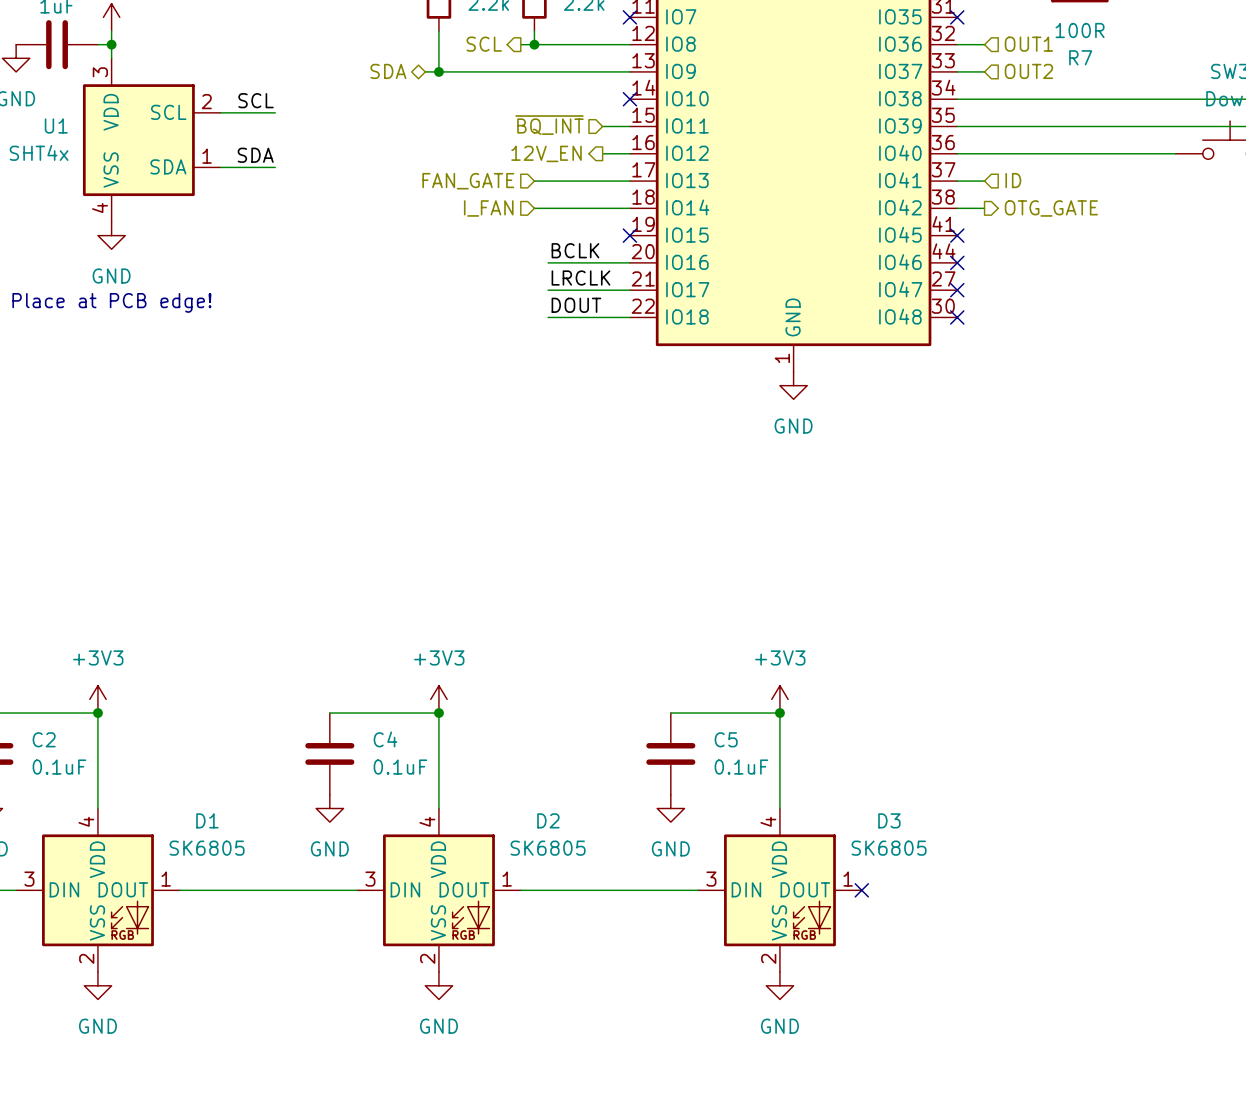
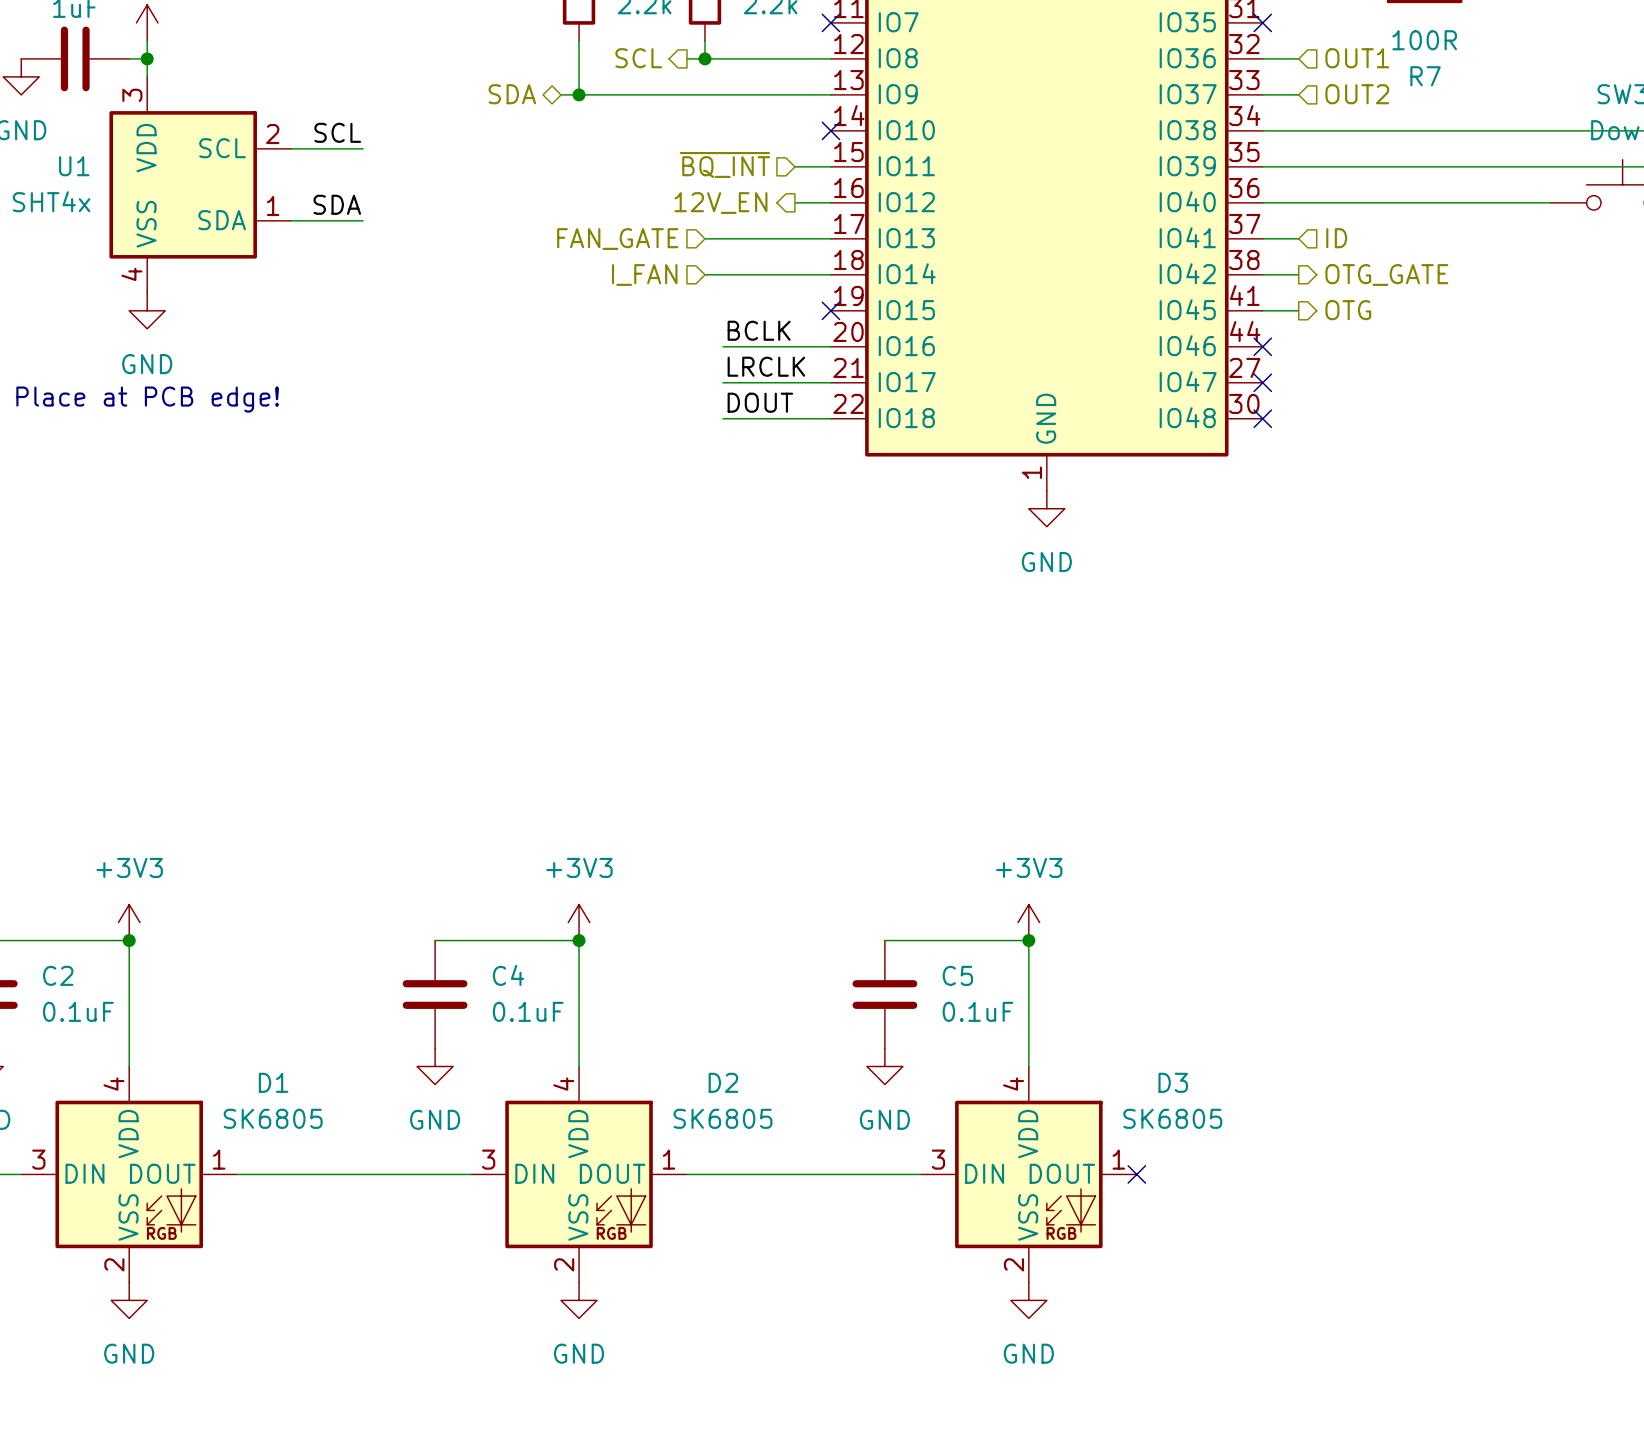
wire: none -> (1262, 310) (1298, 310)
no-connect mark: (957, 235) -> none
hierarchical label: none -> OTG (1348, 310)

